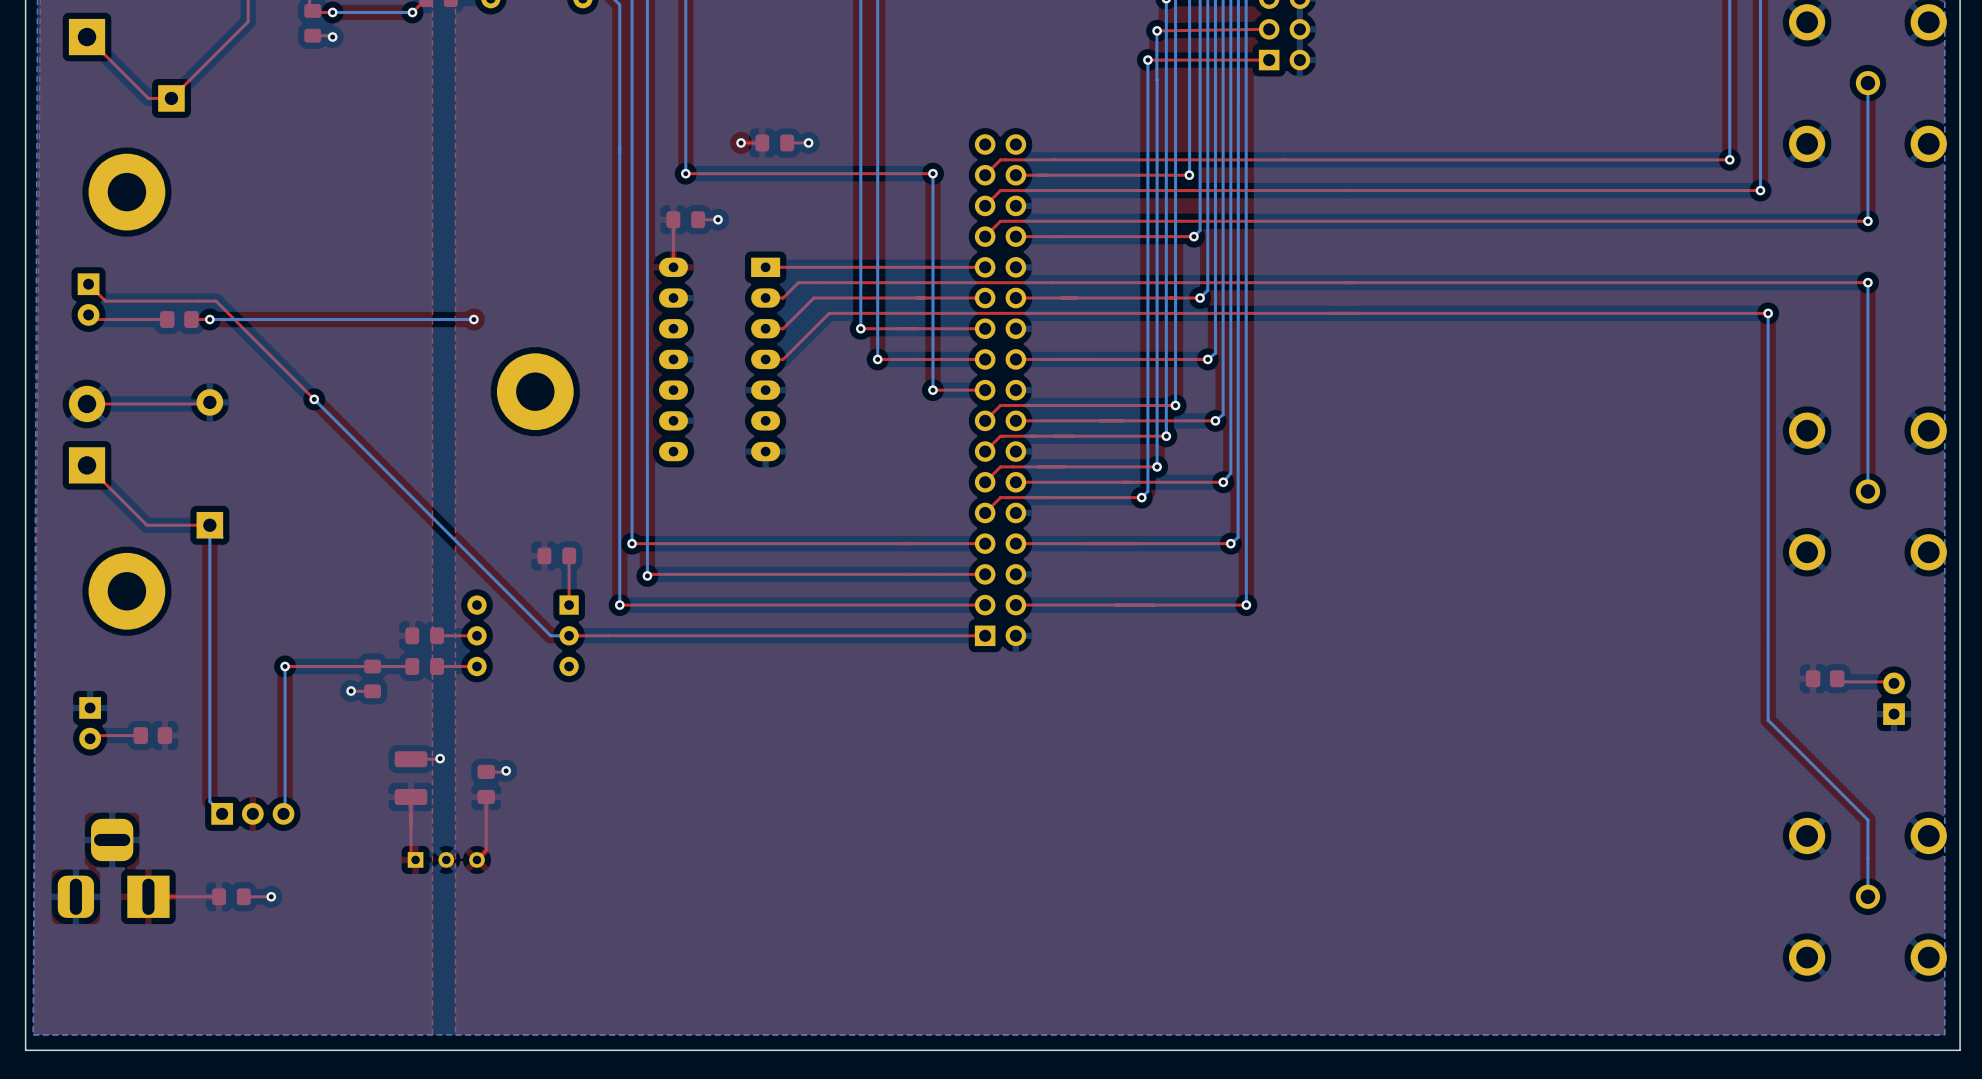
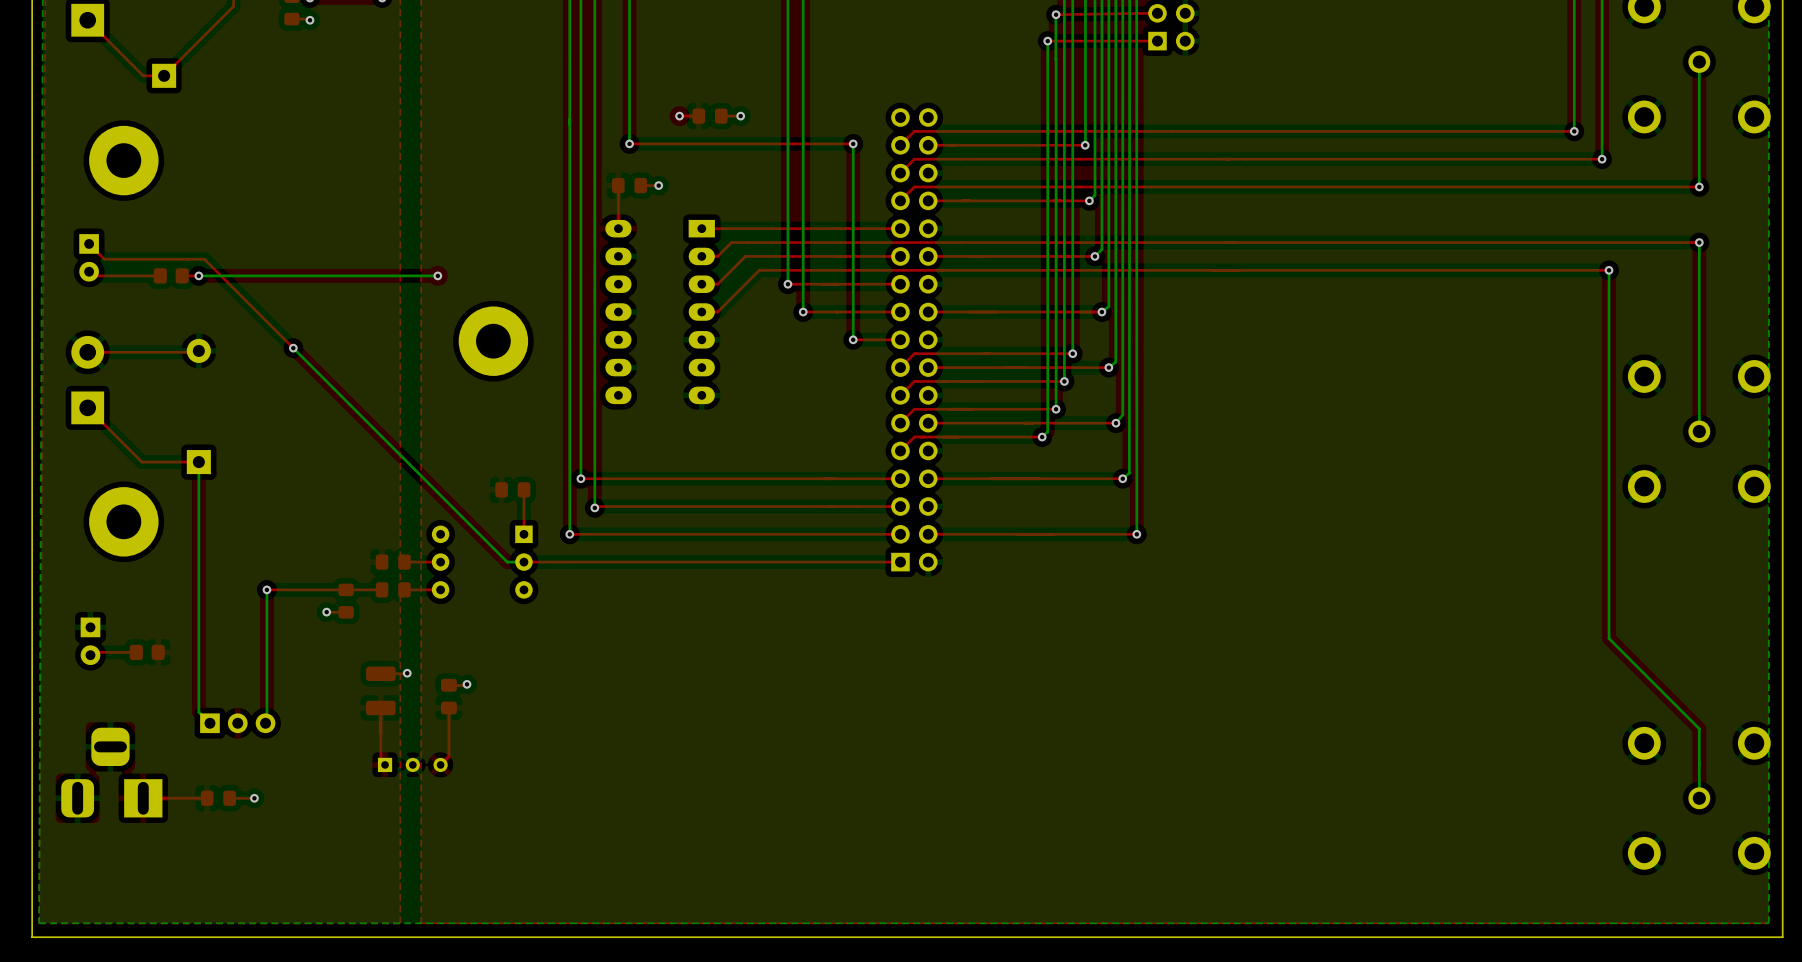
part: (1825, 678) -> none
top track: (1837, 678) (1837, 681) (1894, 683) -> none
part: (1894, 698) -> none

